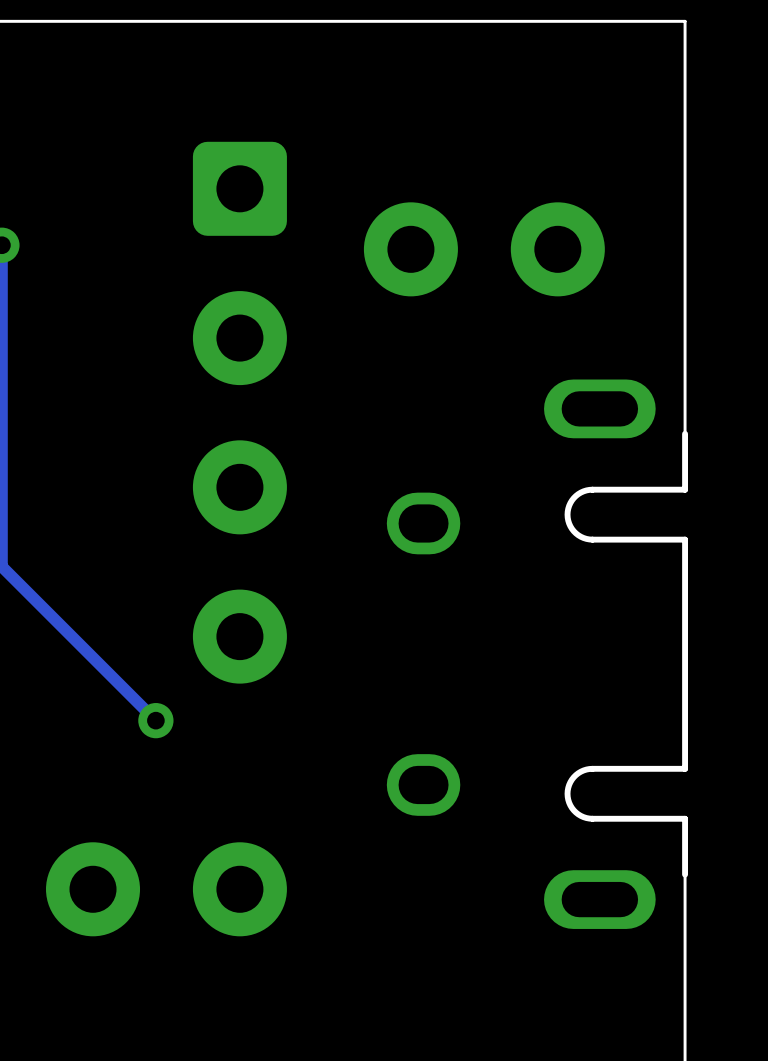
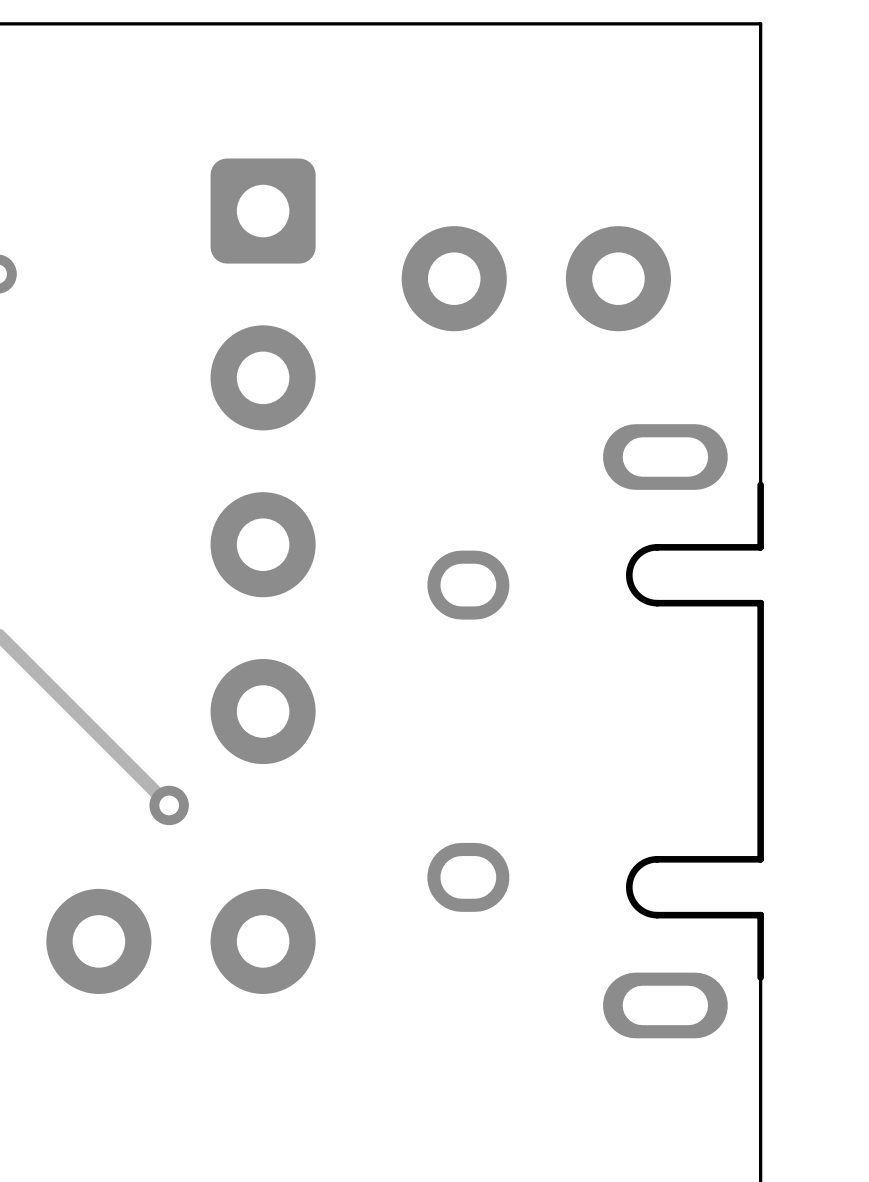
part position: (166, 889) -> (181, 941)

